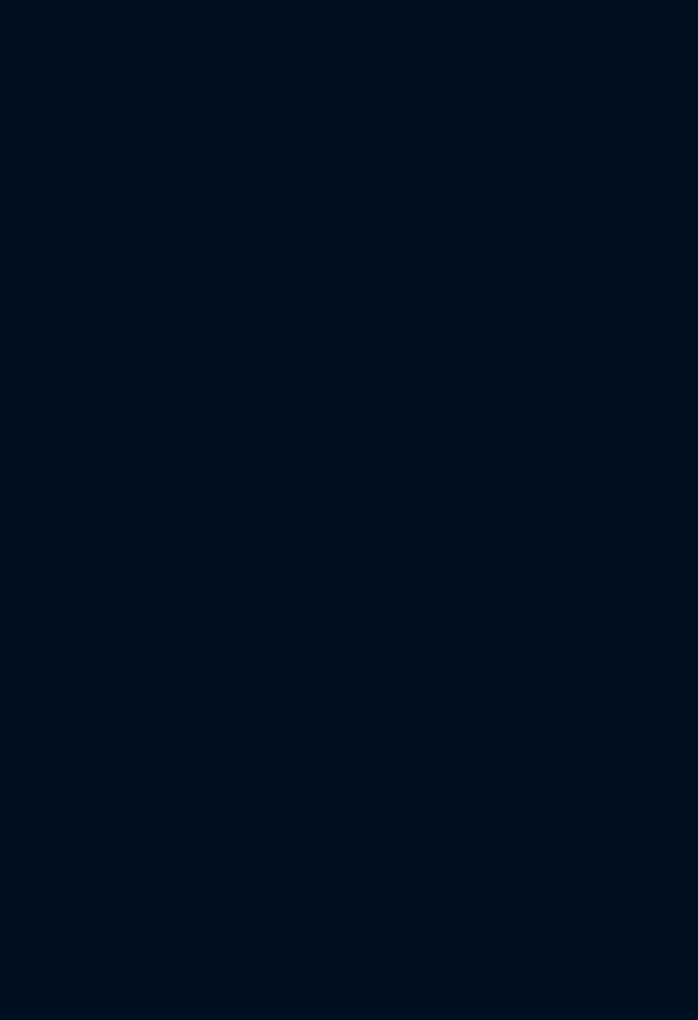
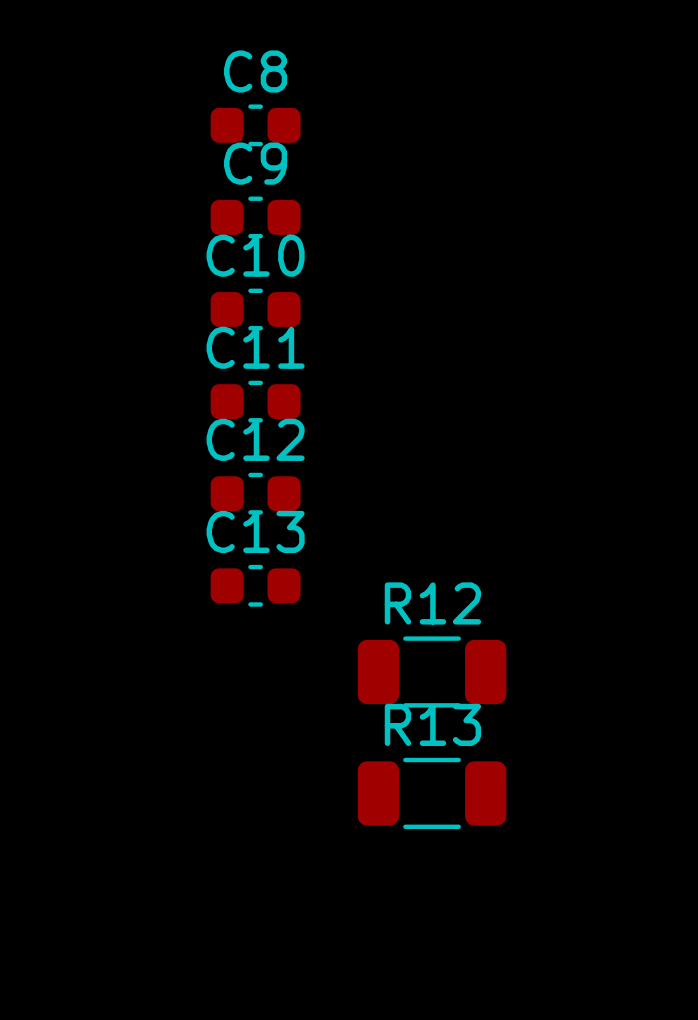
C8: none -> (255, 125)
C9: none -> (255, 217)
C10: none -> (255, 309)
C11: none -> (255, 401)
C12: none -> (255, 493)
C13: none -> (255, 585)
R12: none -> (432, 671)
R13: none -> (432, 793)

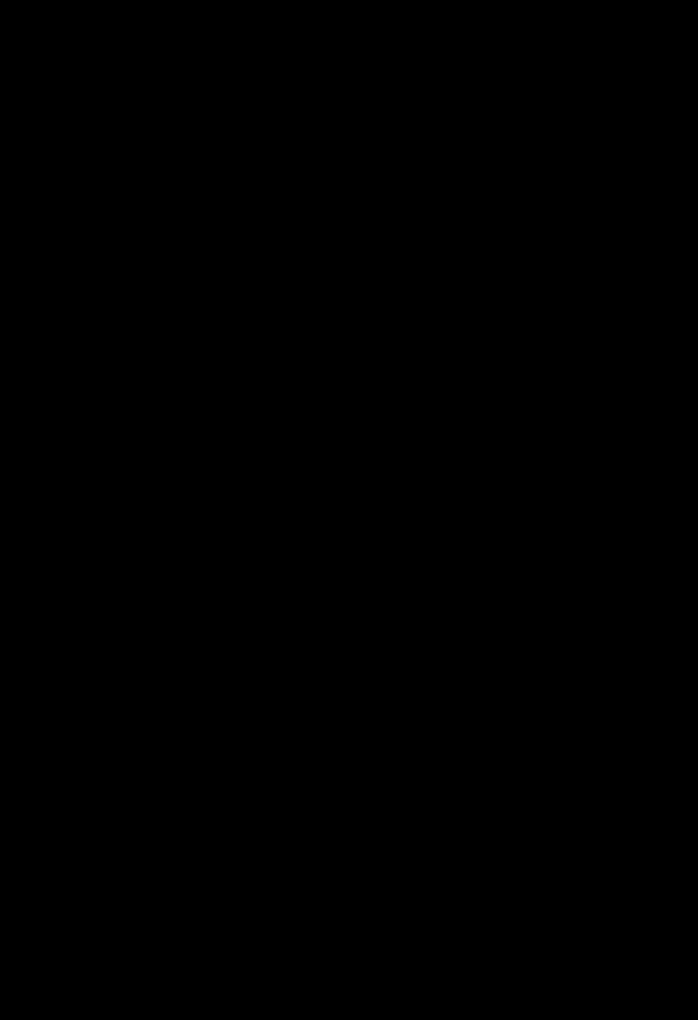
C8: (255, 125) -> none
C9: (255, 217) -> none
C10: (255, 309) -> none
C11: (255, 401) -> none
C12: (255, 493) -> none
C13: (255, 585) -> none
R12: (432, 671) -> none
R13: (432, 793) -> none

